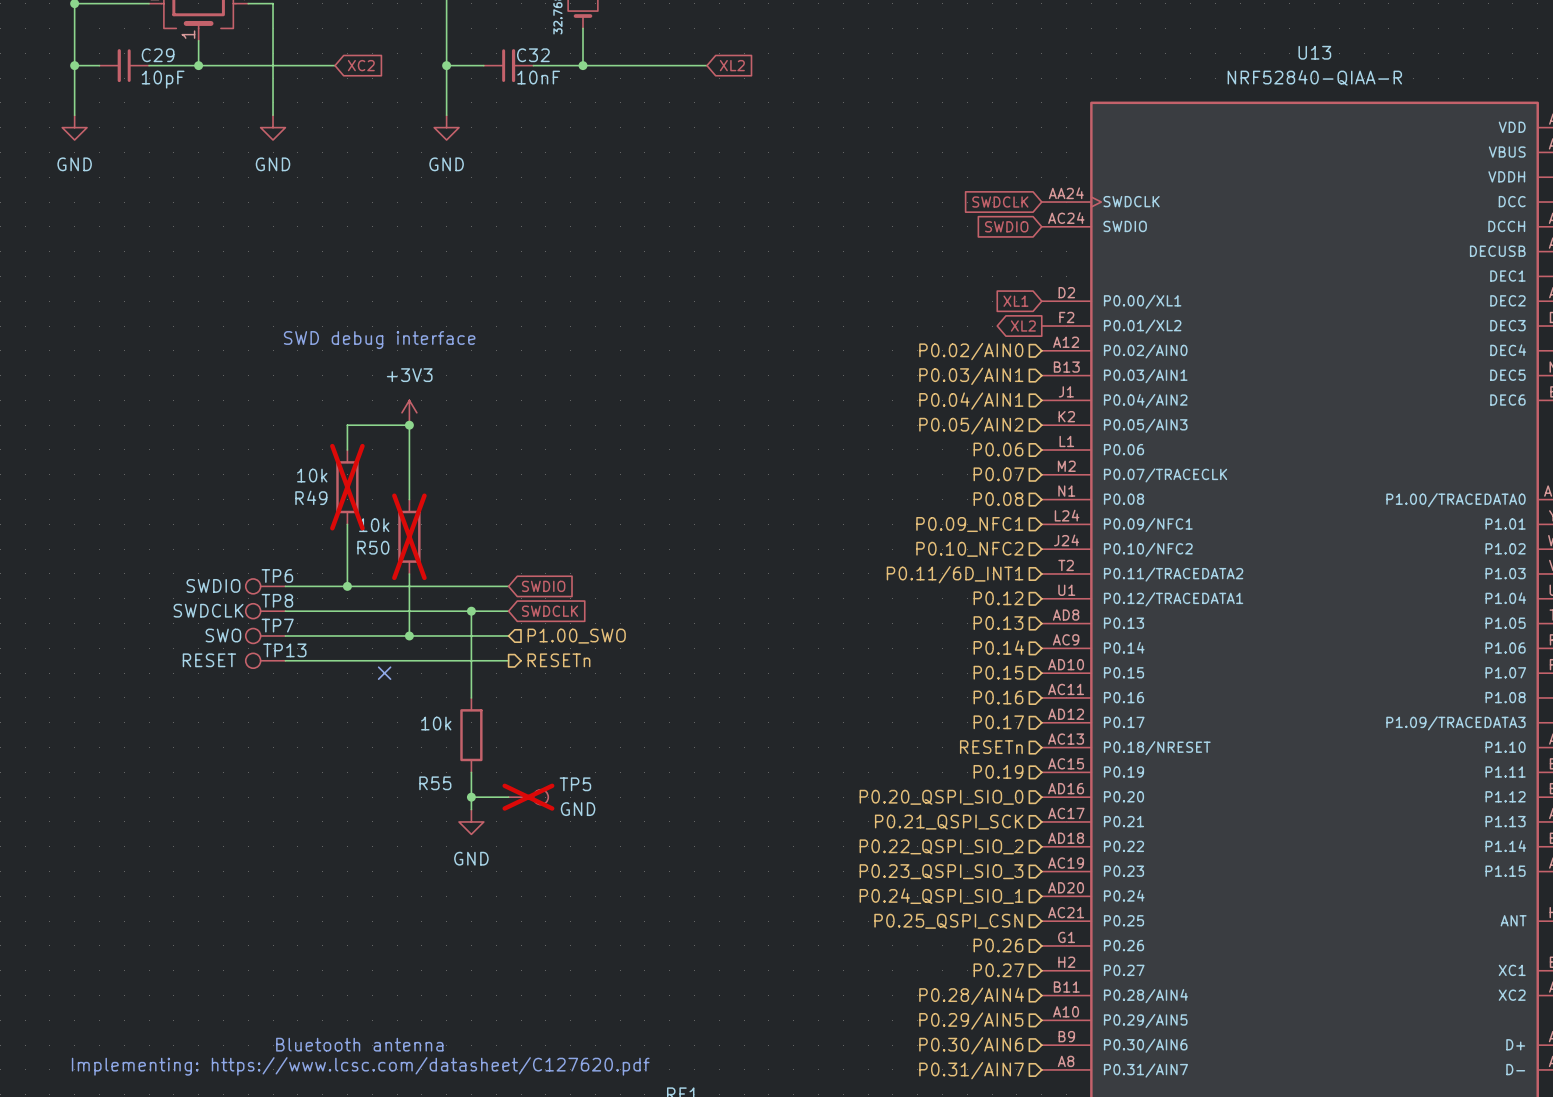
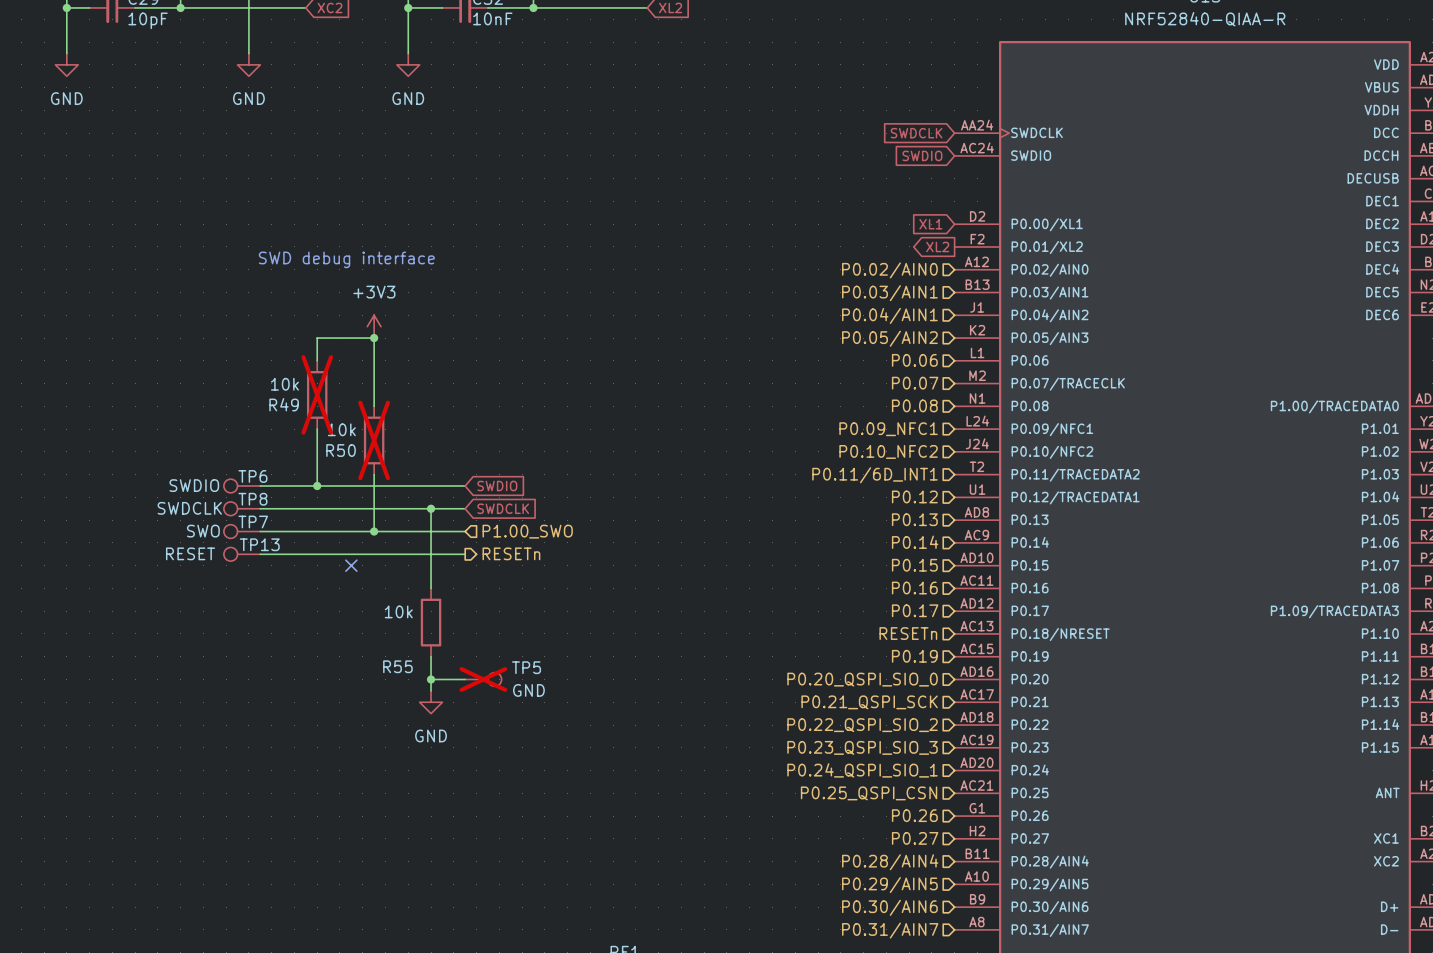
text: Bluetooth antenna (359, 1044) -> none
text: Implementing: https://www.lcsc.com/datasheet/C127620.pdf (360, 1066) -> none

